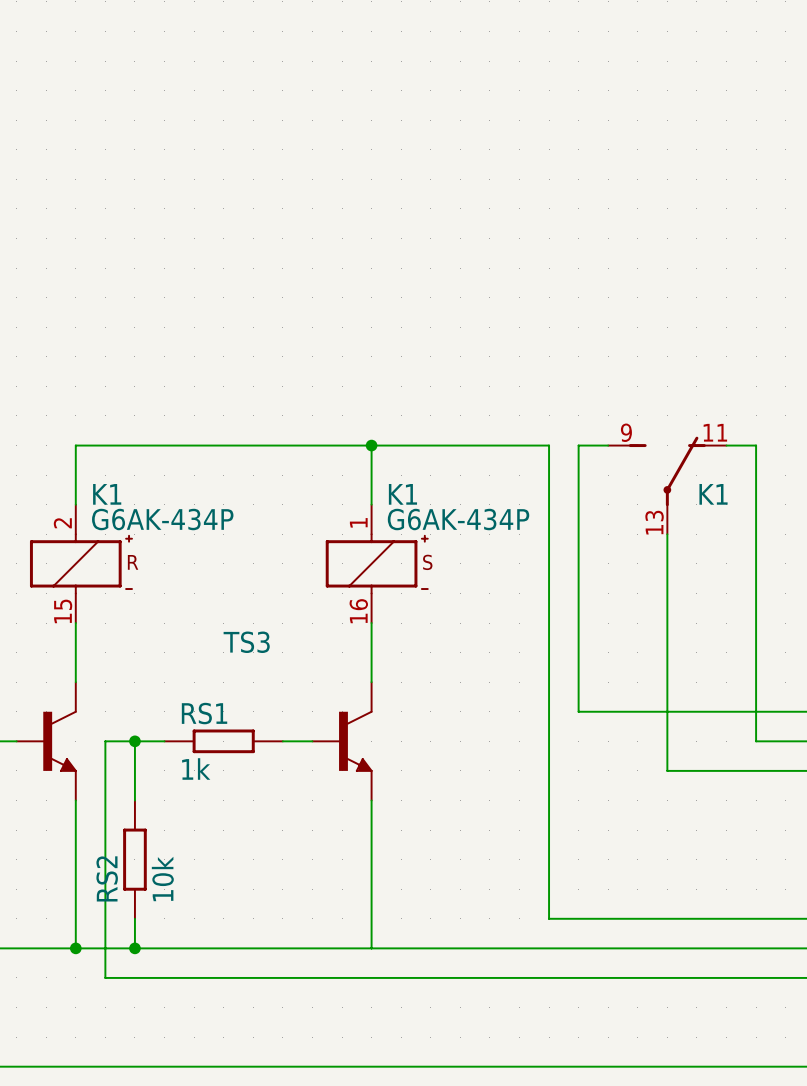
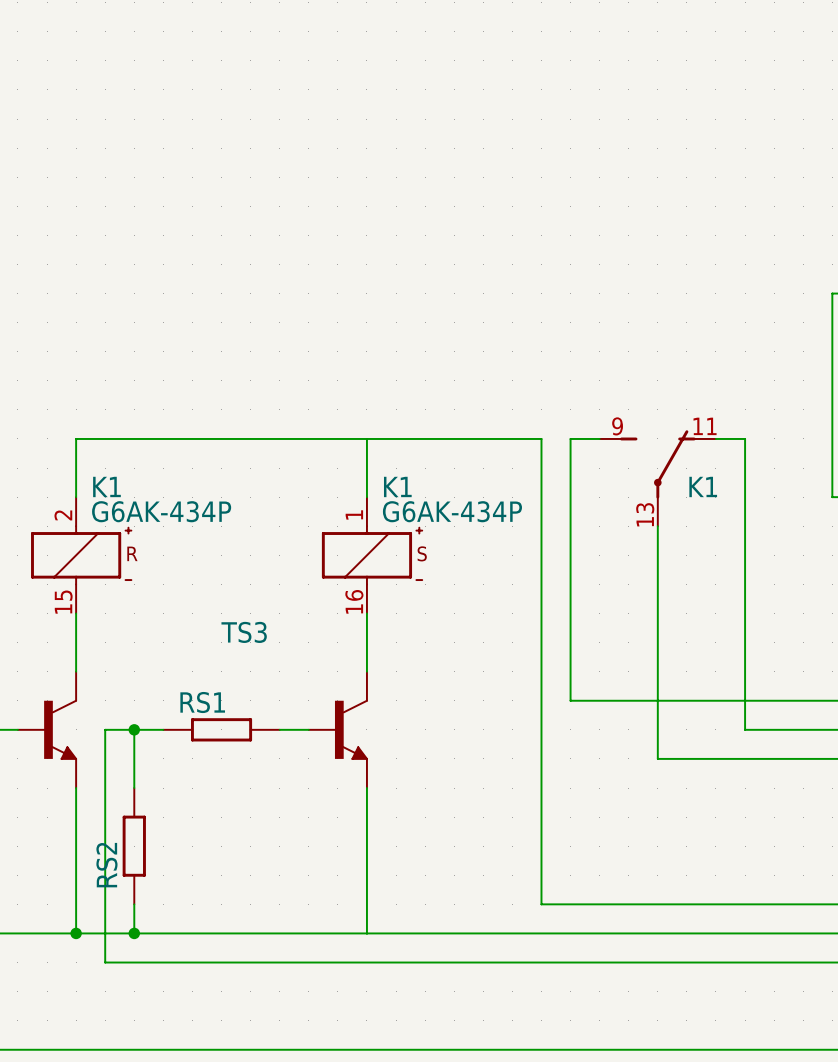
junction: (371, 445) -> none
RS1 value: 1k (196, 768) -> none
RS2 value: 10k (162, 878) -> none

